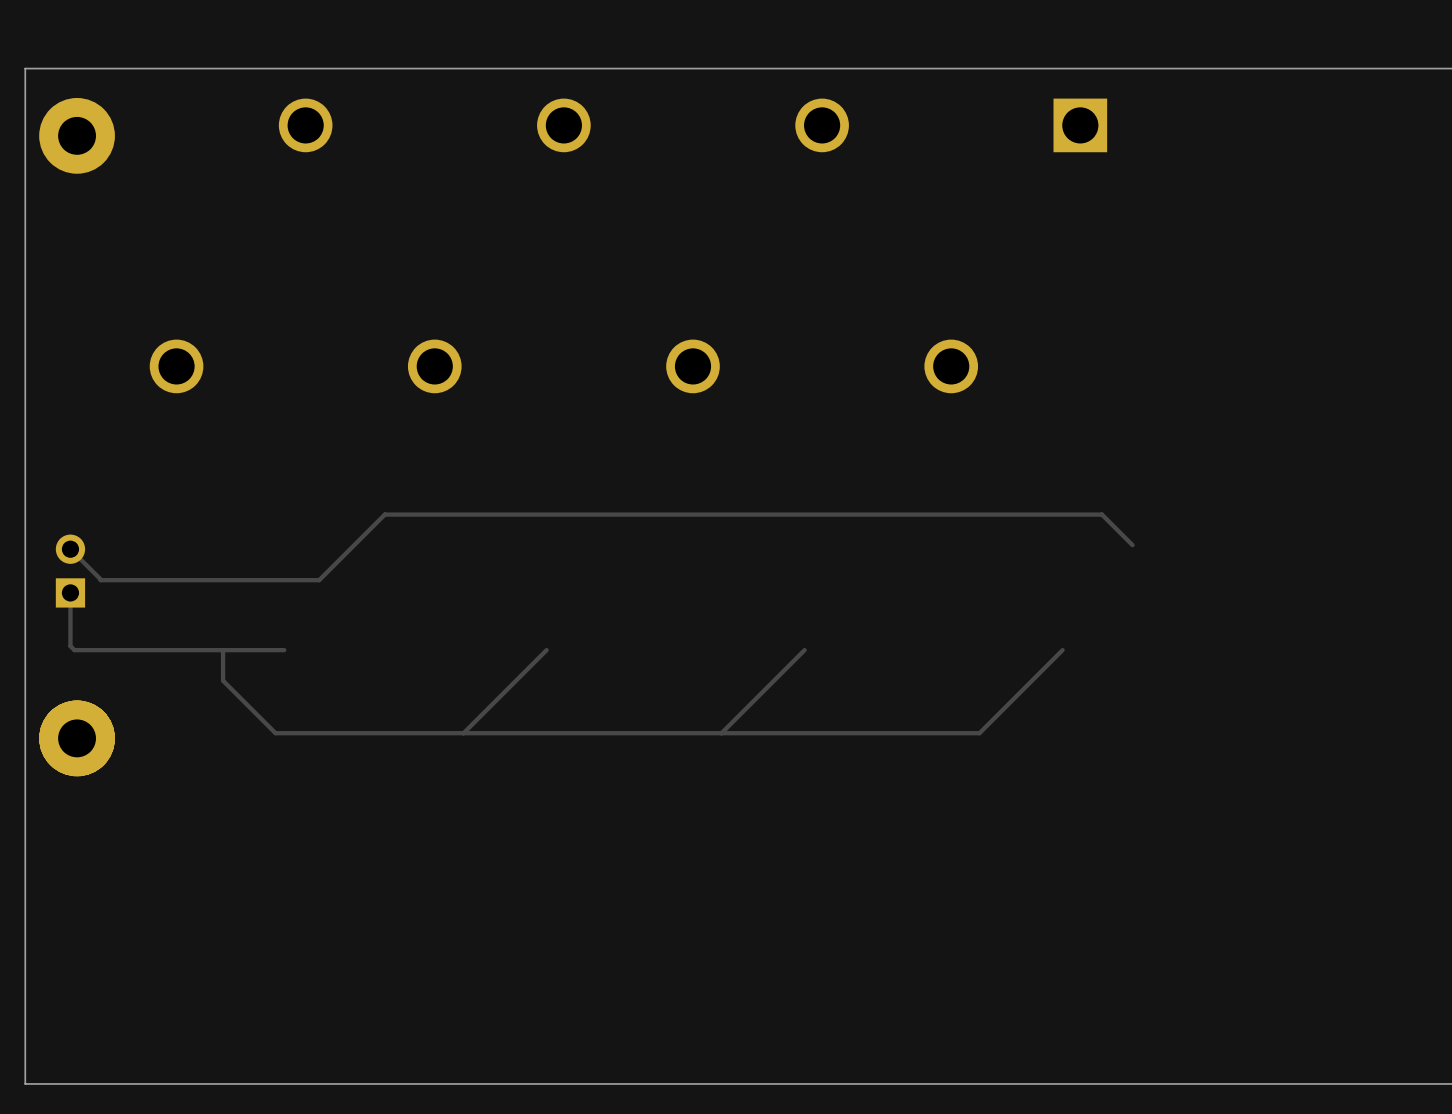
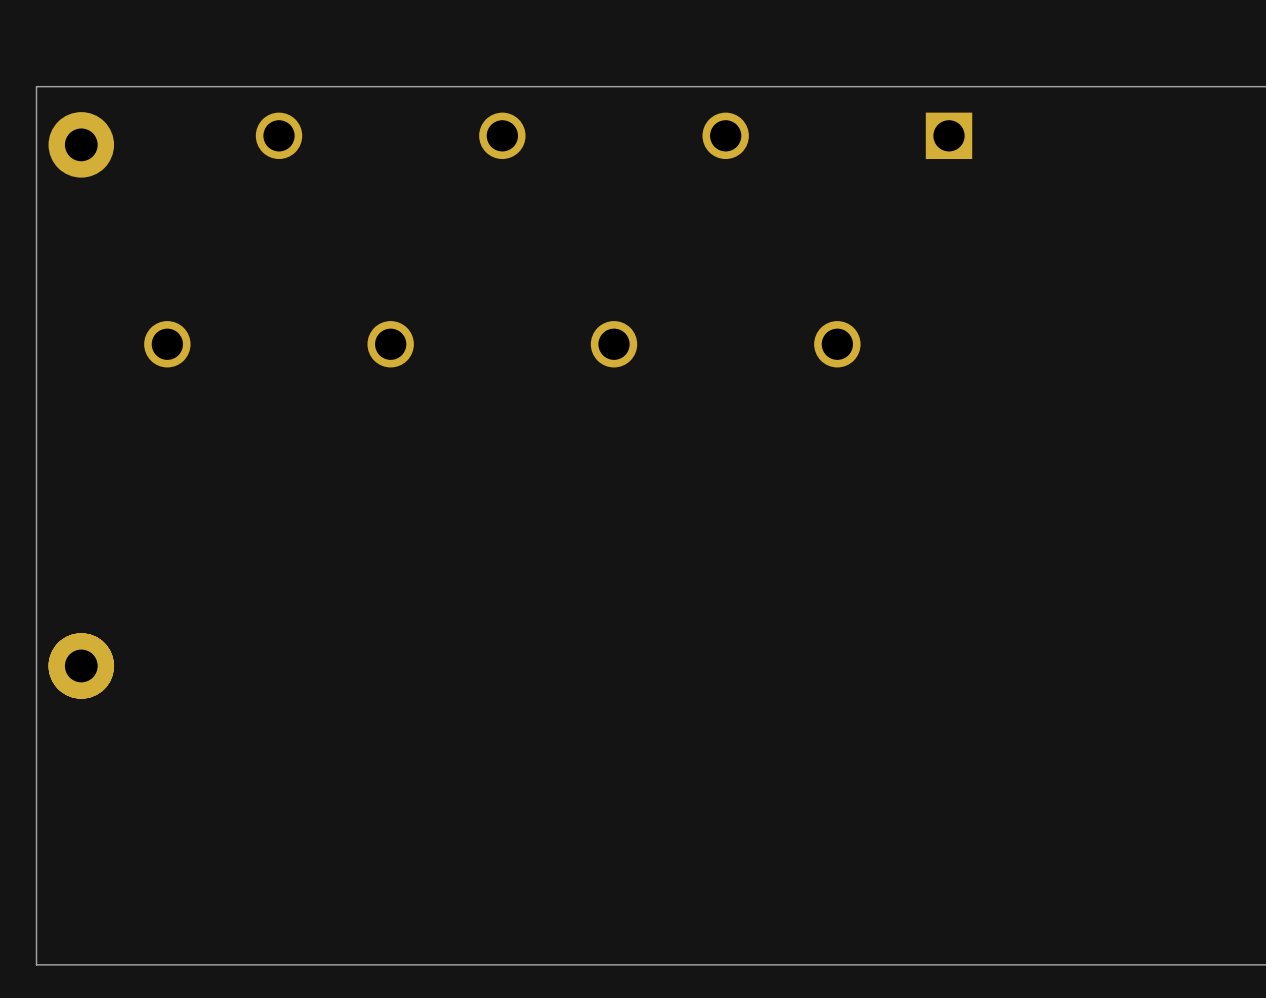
track: (1132, 545) (1101, 514) (384, 514) (319, 580) (100, 580) (70, 549) -> none
part: (70, 571) -> none
track: (70, 592) (70, 646) (74, 650) (284, 650) -> none
track: (546, 650) (463, 733) -> none
track: (804, 650) (721, 733) -> none
track: (1062, 650) (979, 733) (275, 733) (223, 680) (223, 650) -> none

